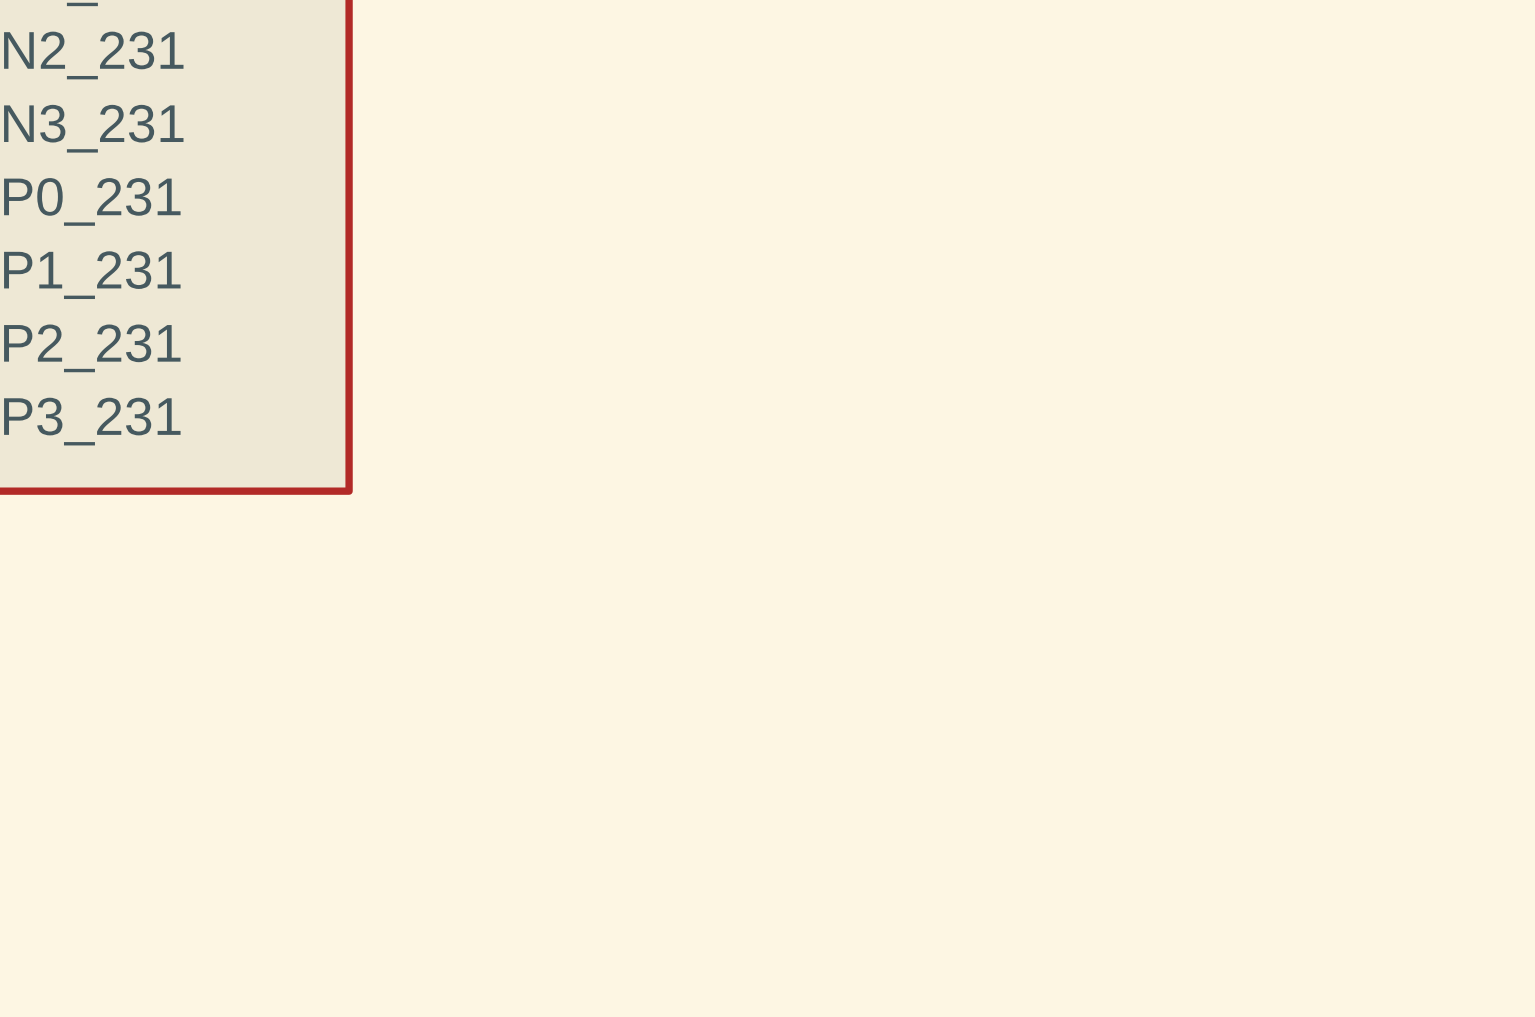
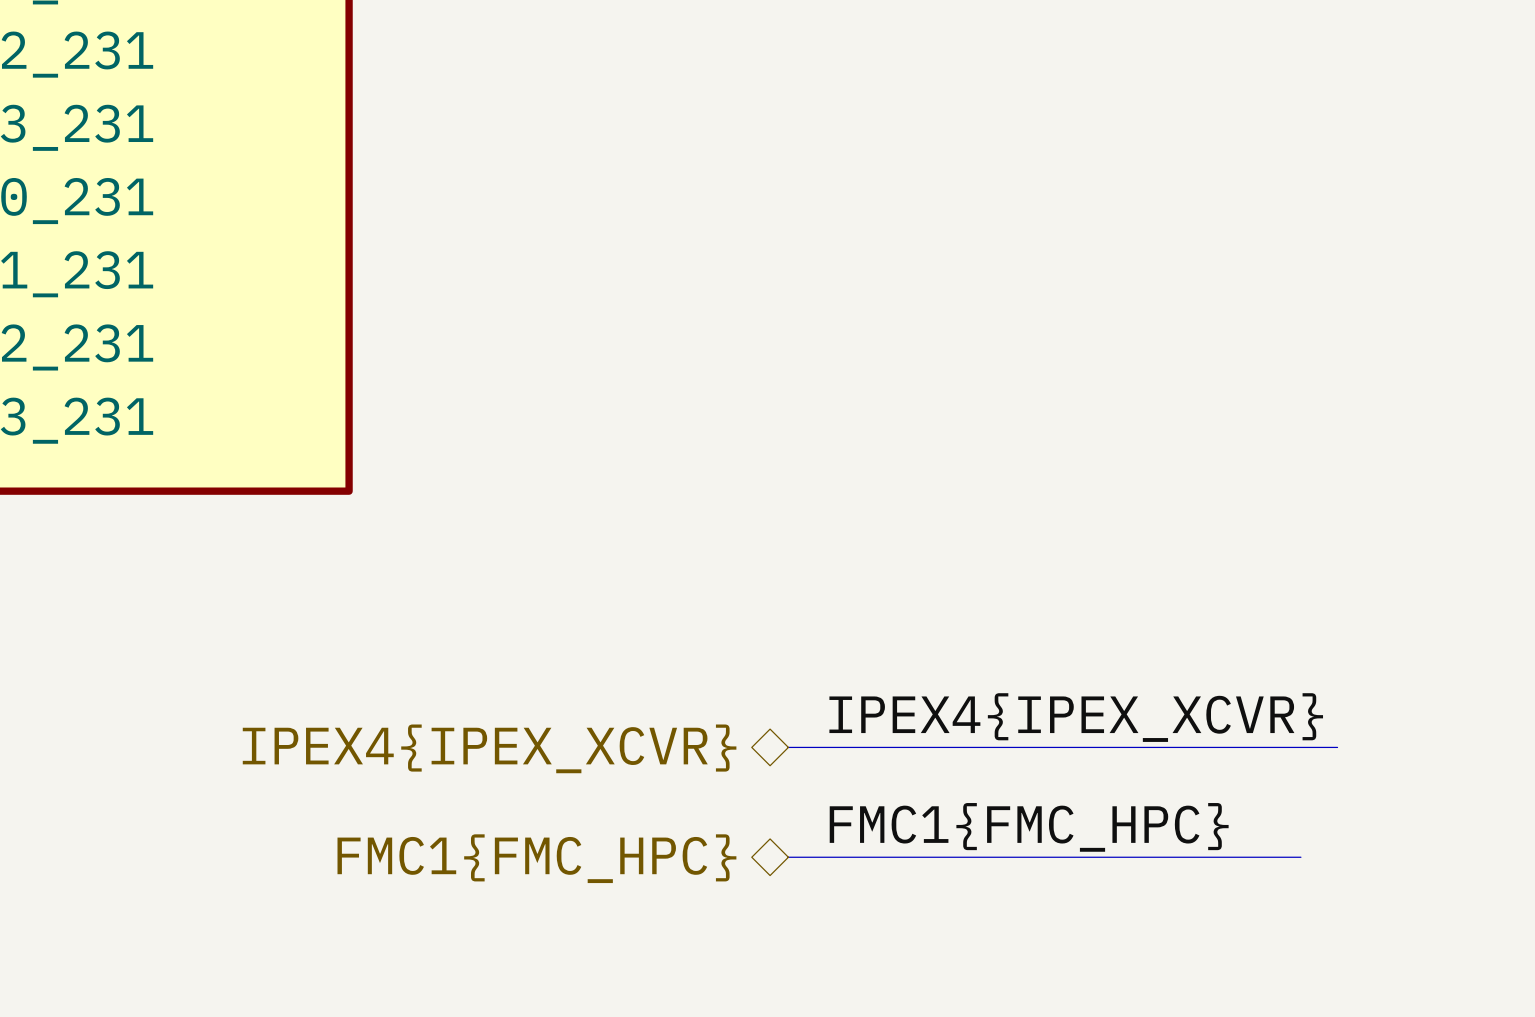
label: none -> IPEX4{IPEX_XCVR} (1076, 717)
bus: none -> (788, 747) (1337, 747)
hierarchical label: none -> IPEX4{IPEX_XCVR} (489, 748)
label: none -> FMC1{FMC_HPC} (1029, 827)
bus: none -> (788, 857) (1300, 857)
hierarchical label: none -> FMC1{FMC_HPC} (536, 858)

